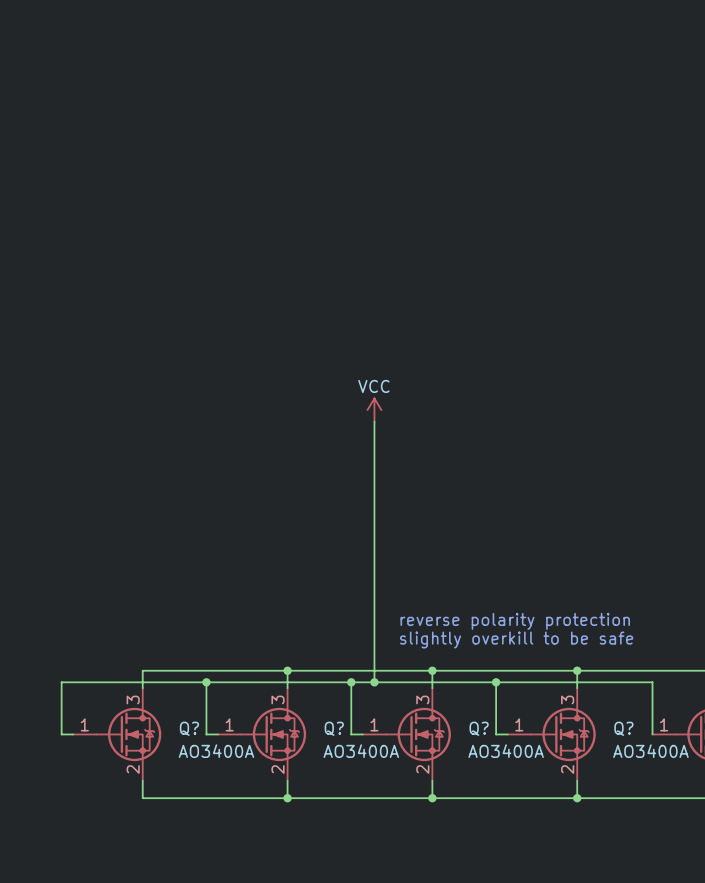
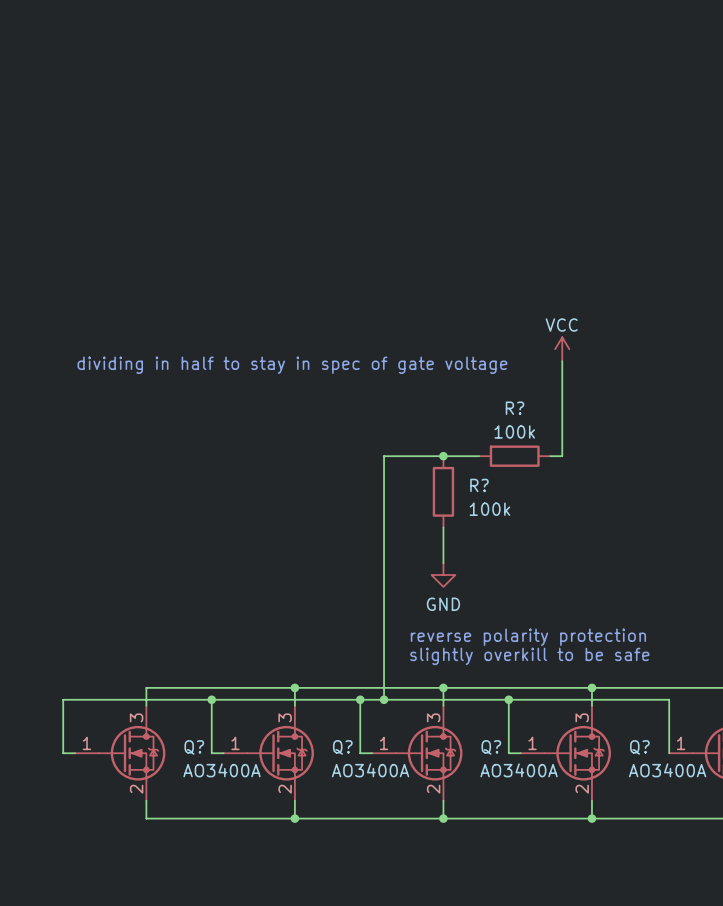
wire: none -> (562, 361) (562, 456) (550, 456)
text: none -> dividing in half to stay in spec of gate voltage (292, 365)
power symbol position: VCC (374, 410) -> VCC (562, 349)
wire: (374, 421) (374, 444) -> (479, 456) (384, 456)
junction: none -> (443, 456)
R?: none -> 100k (514, 456)
R?: none -> 100k (443, 491)
wire: none -> (443, 527) (443, 563)
power symbol: none -> GND (443, 575)

